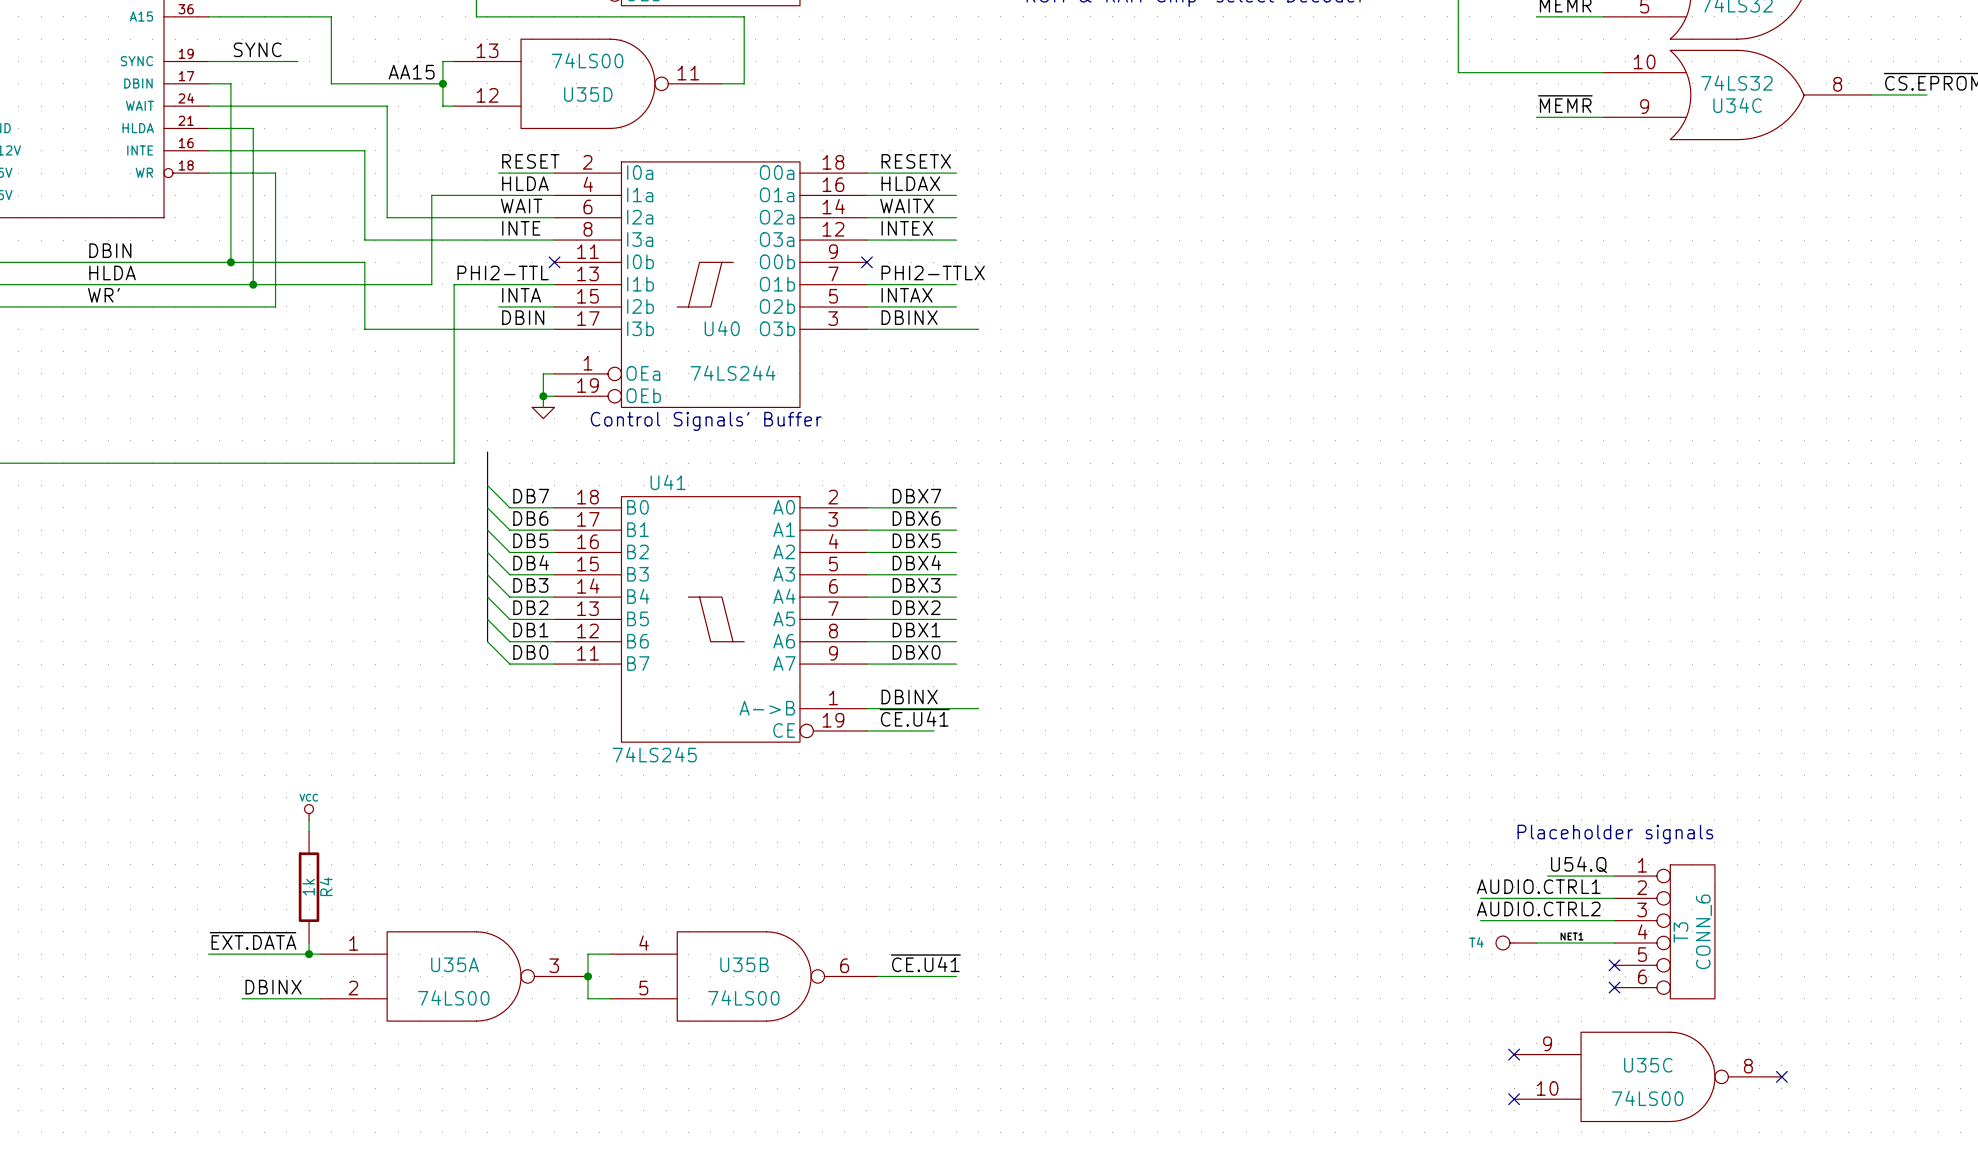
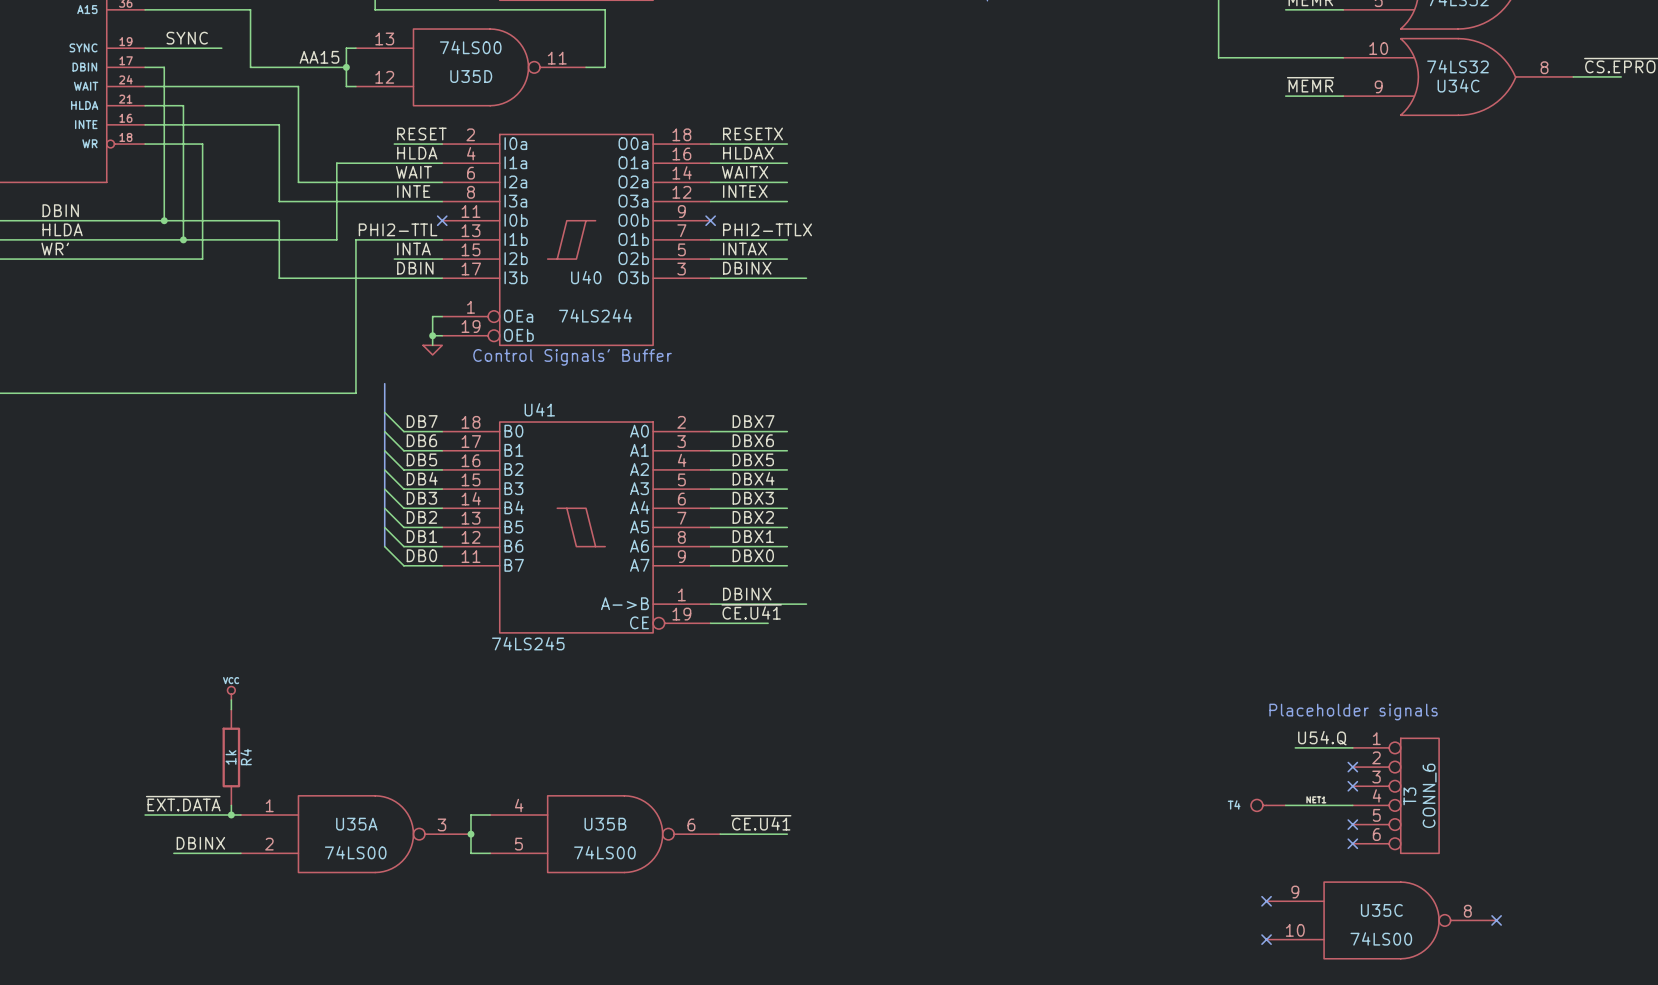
label: AUDIO.CTRL1 (1538, 886) -> none
wire: (1480, 898) (1614, 898) -> none
no-connect mark: none -> (1352, 767)
label: AUDIO.CTRL2 (1538, 908) -> none
wire: (1480, 920) (1614, 920) -> none
no-connect mark: none -> (1352, 786)

